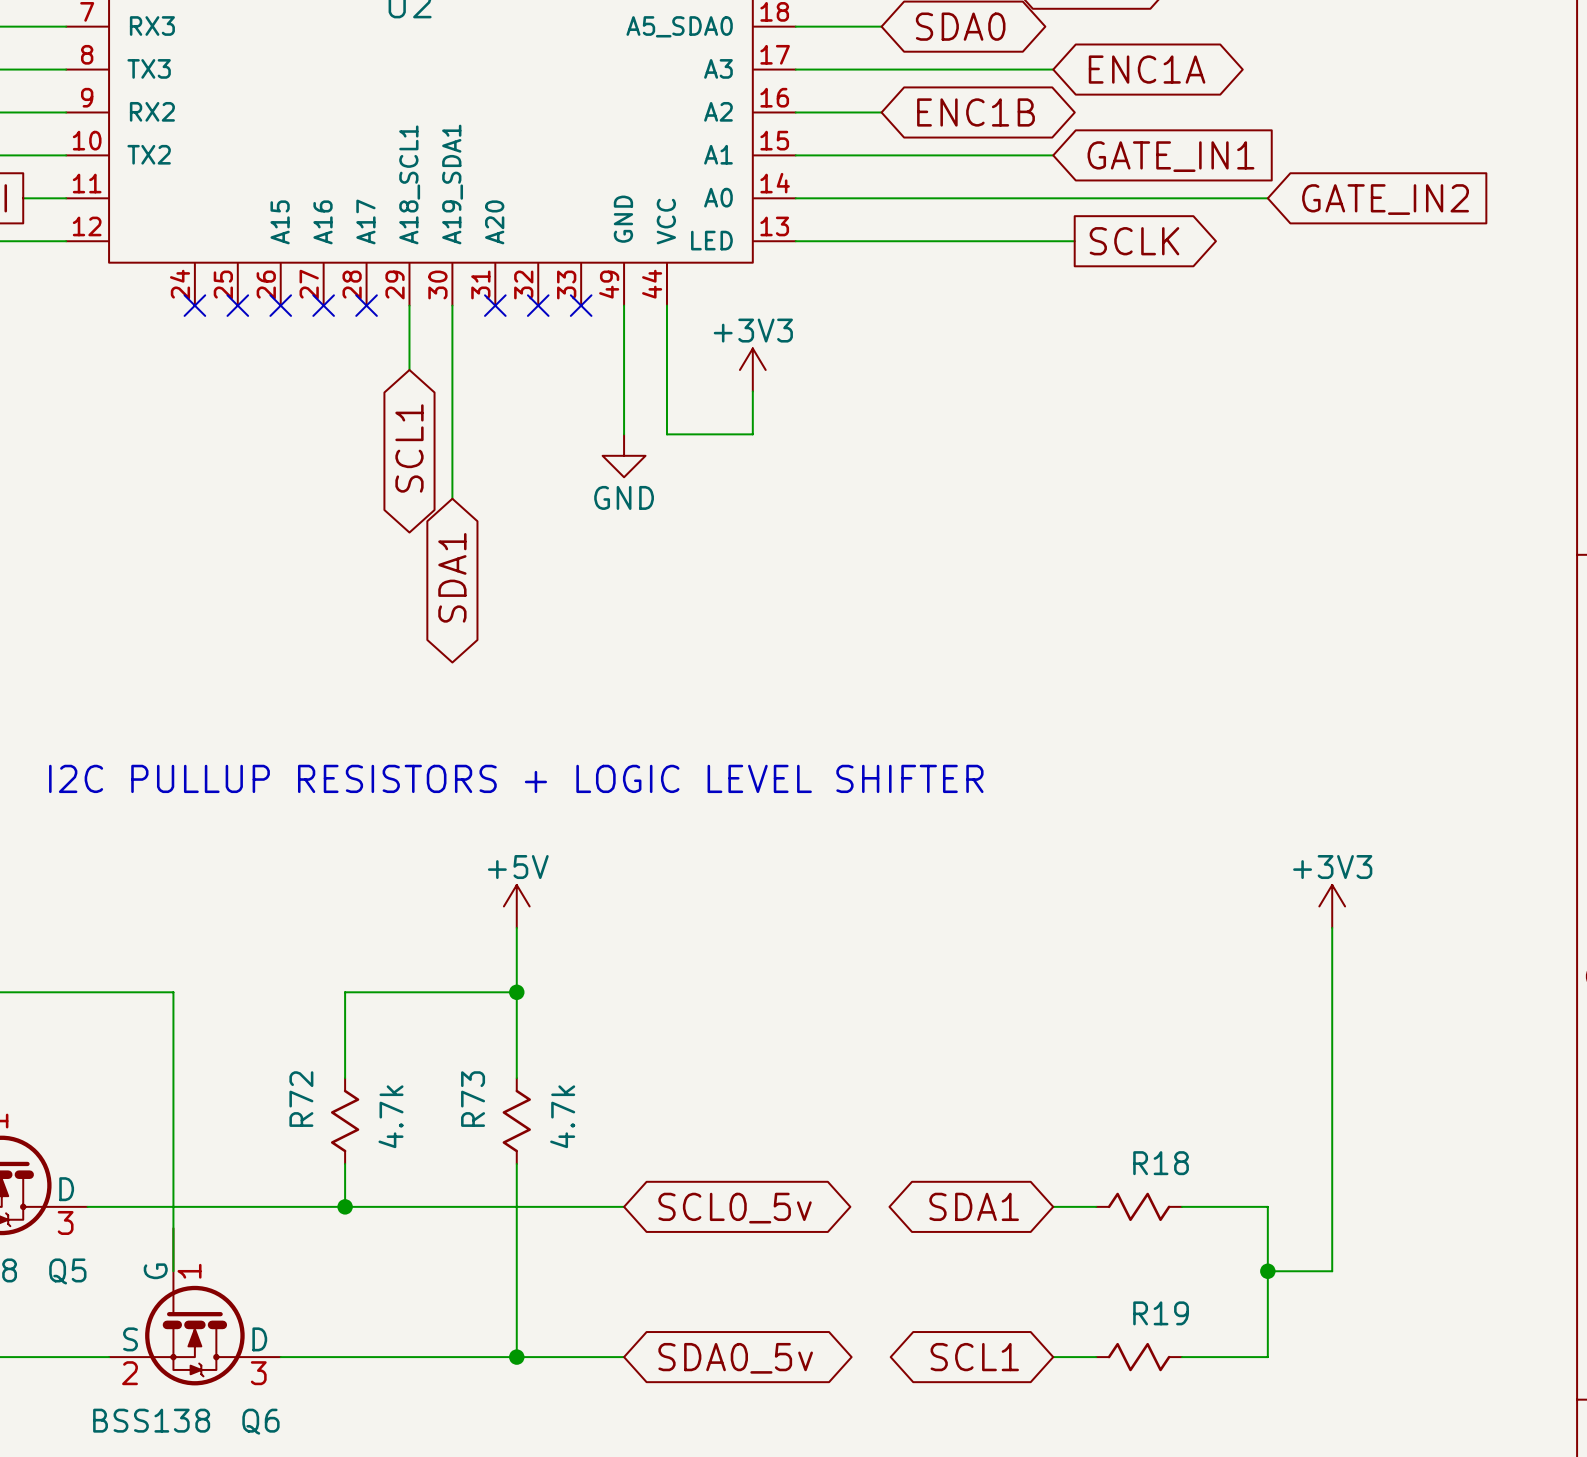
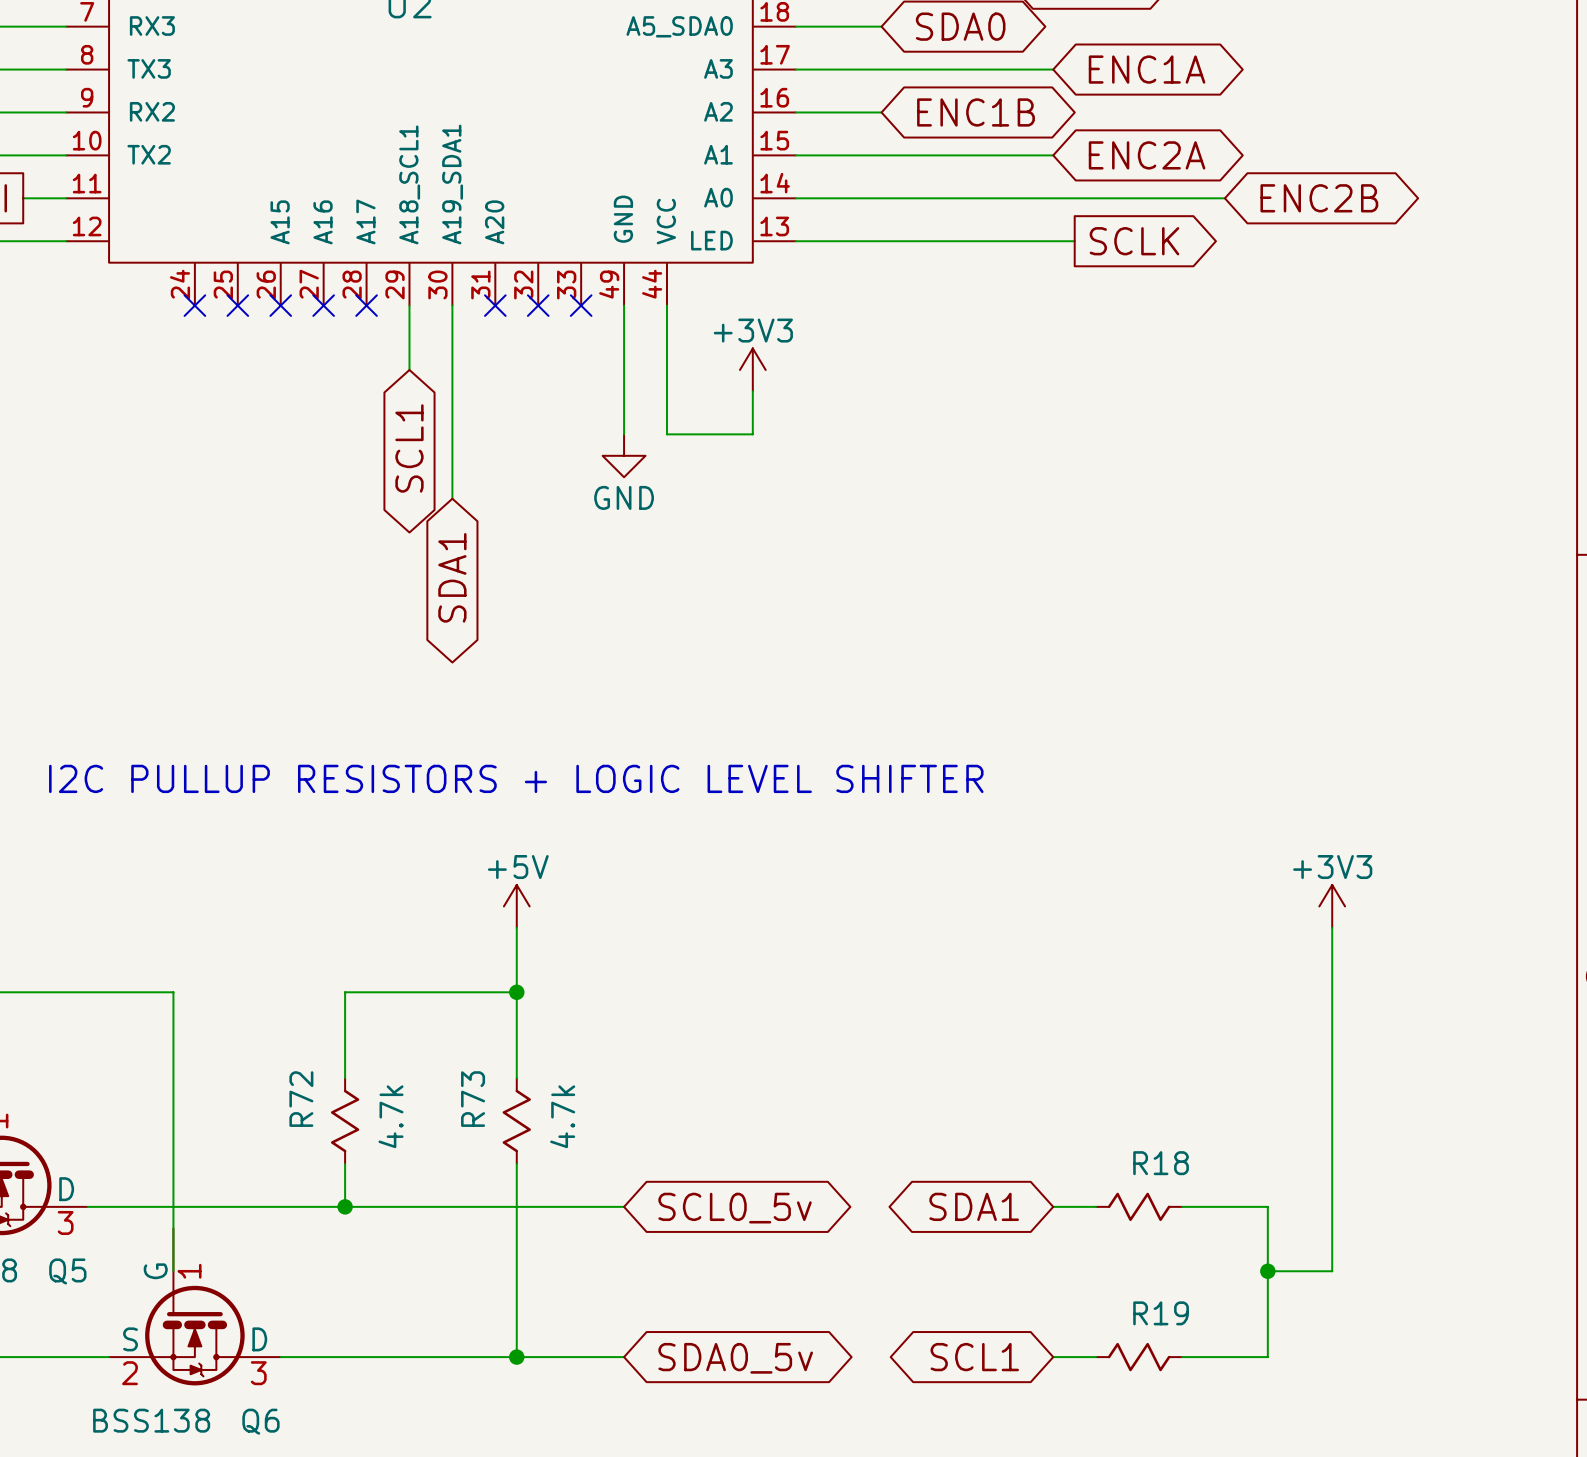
global label shape: input (1170, 156) -> bidirectional (1147, 155)
global label: GATE_IN1 (1170, 156) -> ENC2A (1147, 155)
wire: (1224, 198) (1267, 198) -> none
global label: none -> ENC2B (1319, 198)
global label: GATE_IN2 (1385, 199) -> none

